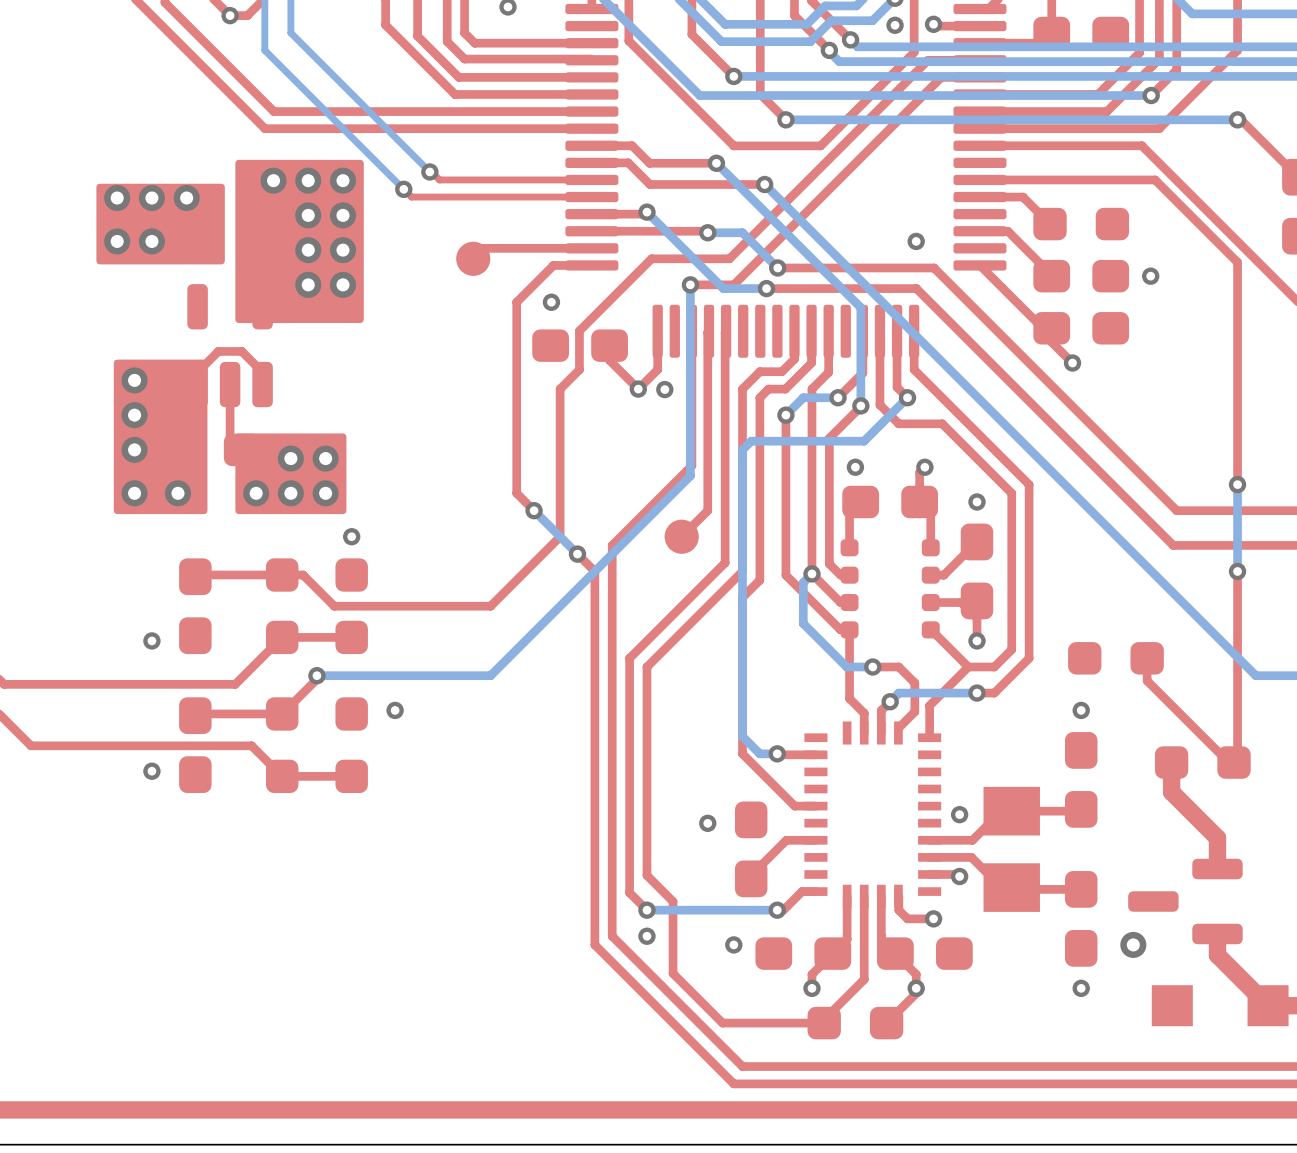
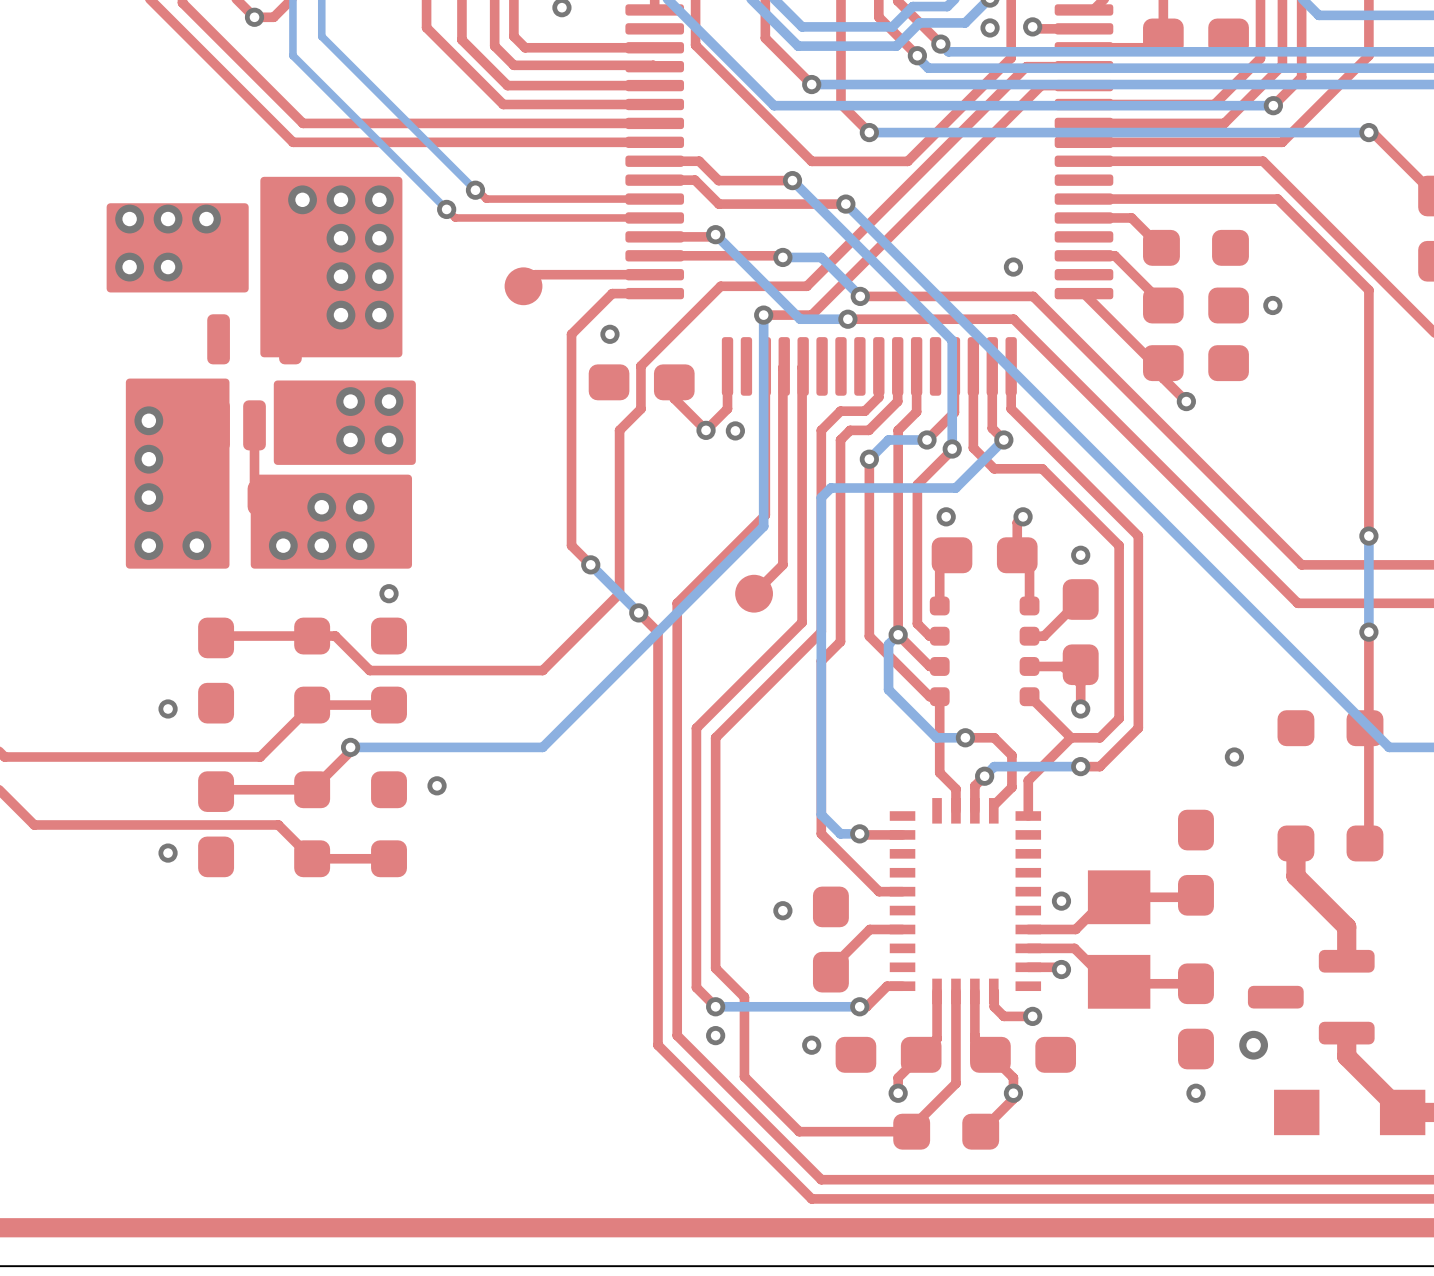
drawing: none -> [273, 380, 416, 465]
drawing shape: [113, 359, 208, 515] -> [125, 378, 230, 569]
via: none -> (350, 401)
via: none -> (389, 401)
top track: (262, 372) (241, 351) (218, 351) (197, 372) -> none
via: none -> (350, 439)
via: none -> (389, 439)
drawing shape: [235, 433, 347, 515] -> [250, 474, 413, 569]
part position: (1115, 658) -> (1330, 728)
top track: (1147, 658) (1147, 680) (1228, 762) -> none
via position: (1081, 710) -> (1234, 757)

